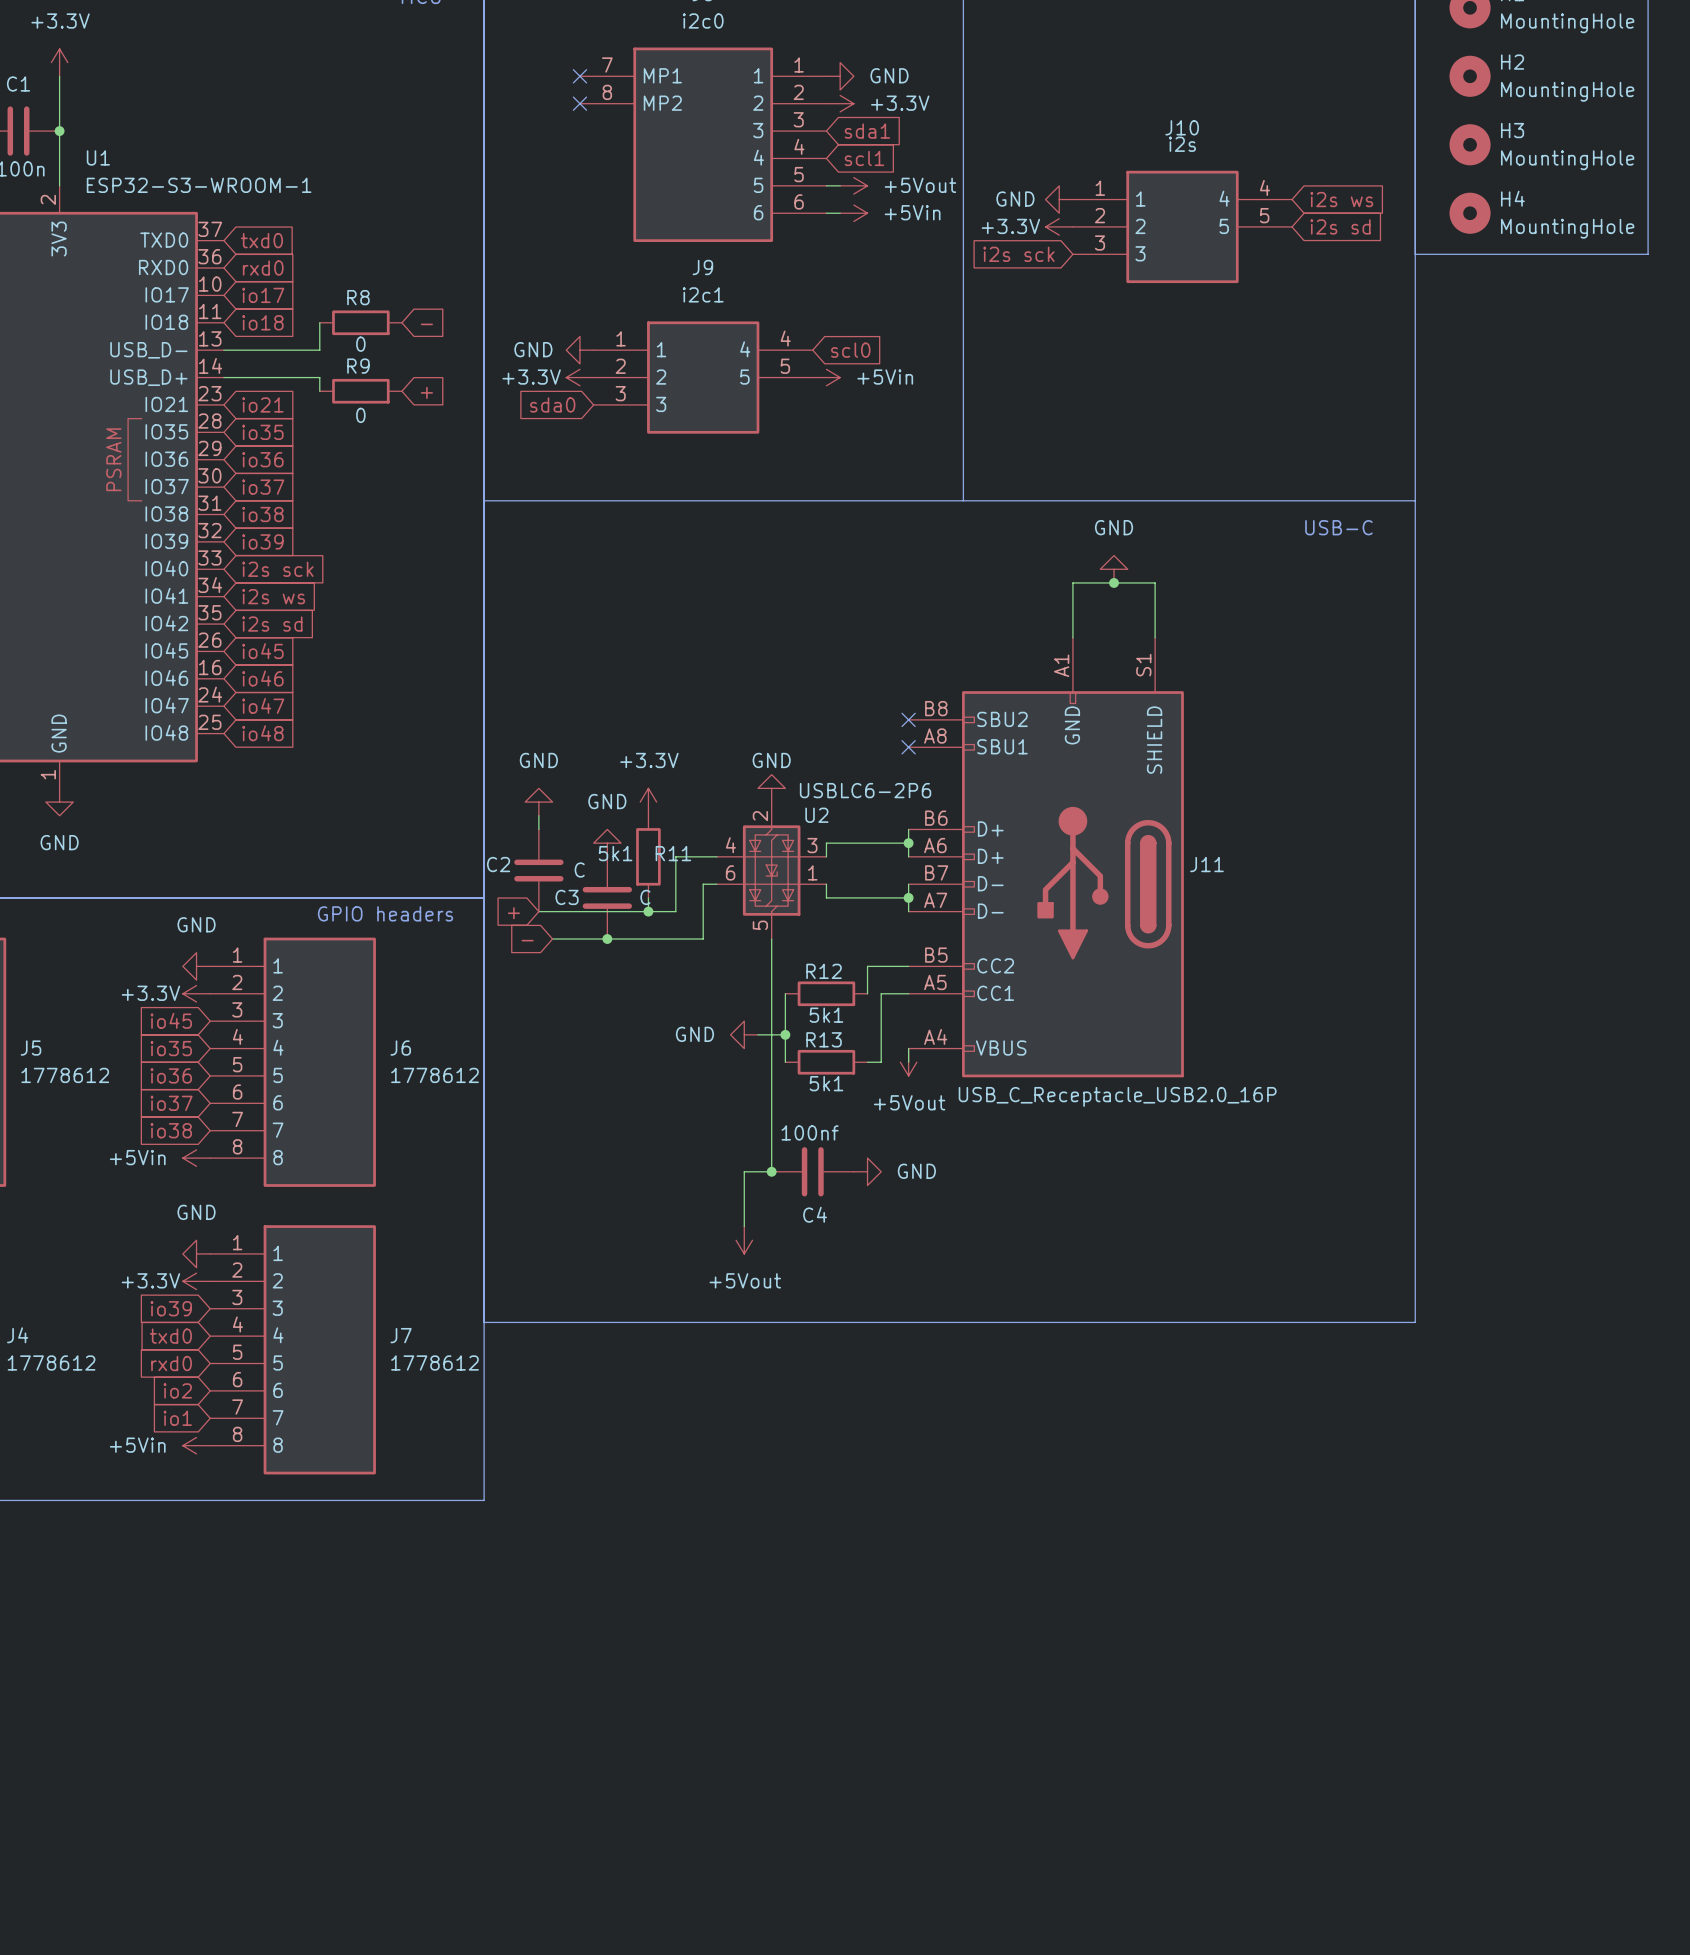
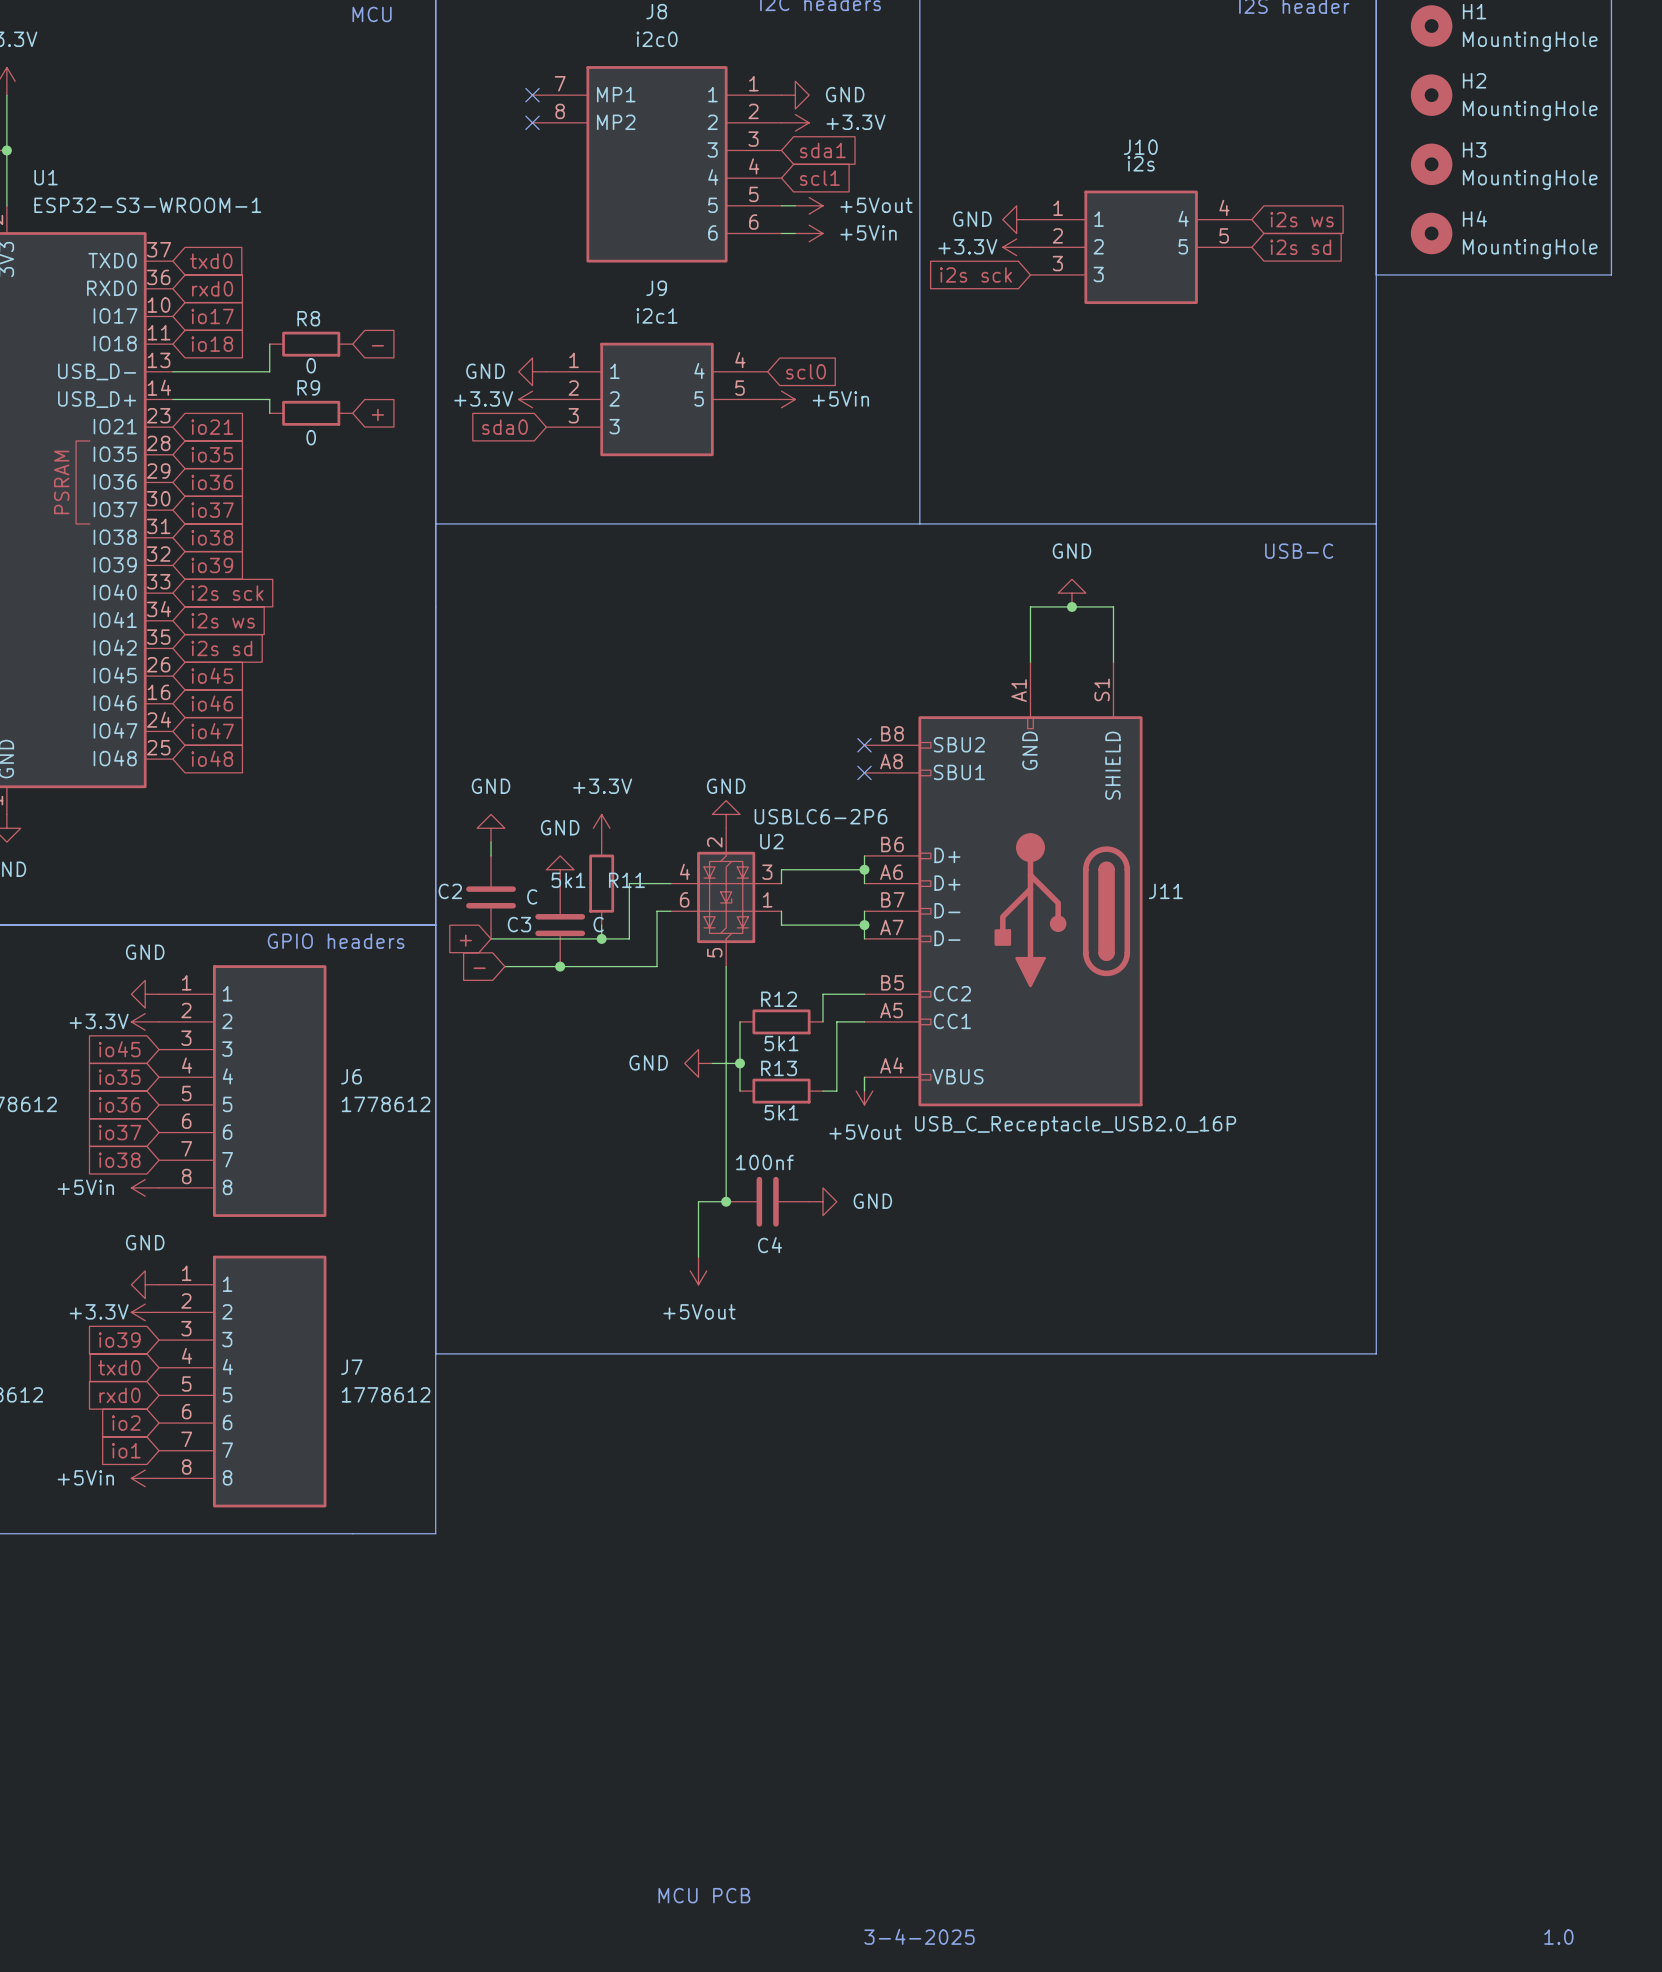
text: none -> MCU PCB (704, 1895)
text: none -> 3-4-2025 (919, 1936)
text: none -> 1.0 (1558, 1937)

